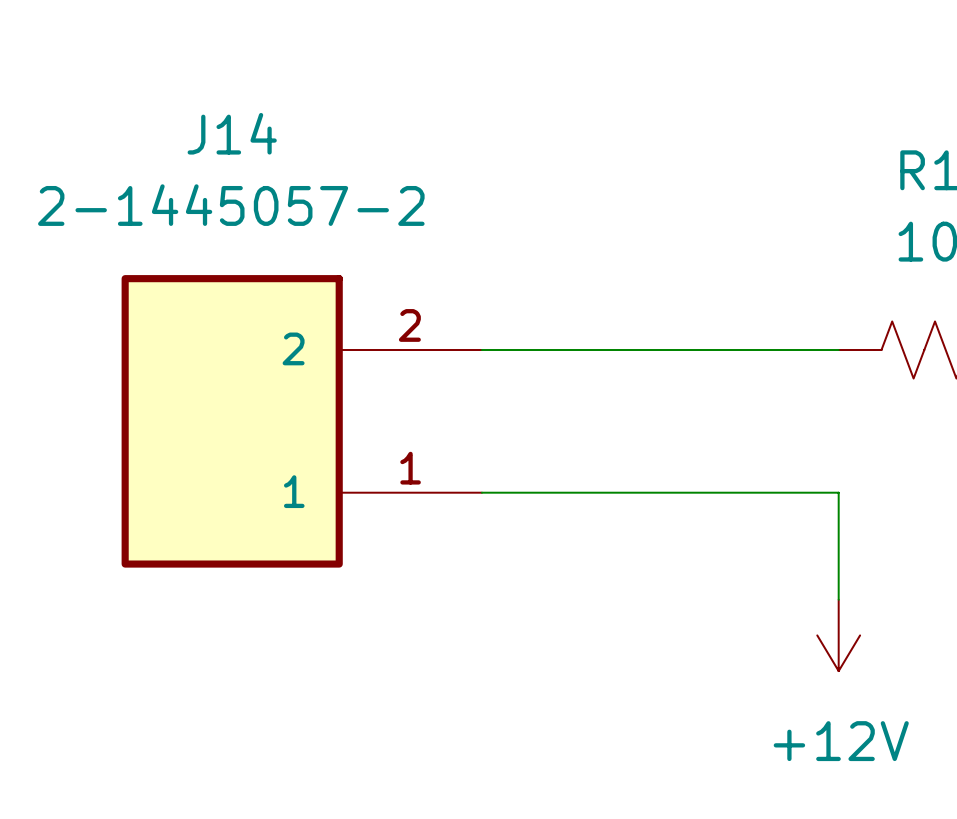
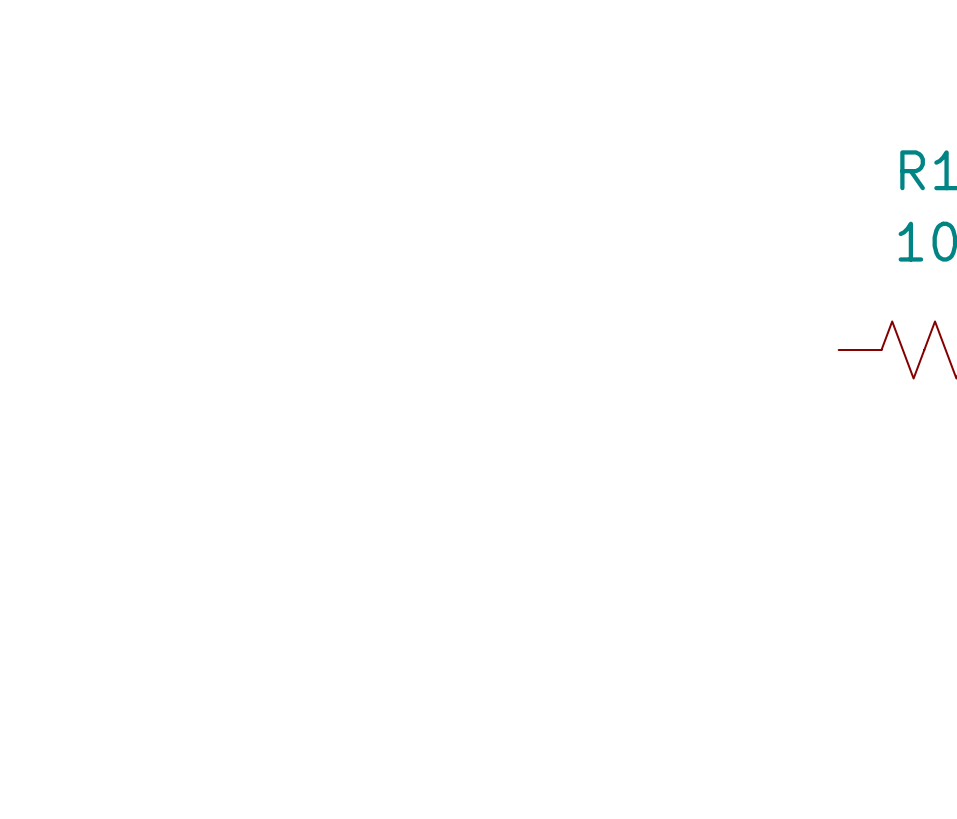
wire: (481, 349) (838, 349) -> none
J14: 2-1445057-2 (301, 421) -> none
wire: (481, 492) (838, 492) (838, 599) -> none
power symbol: +12V (838, 635) -> none

